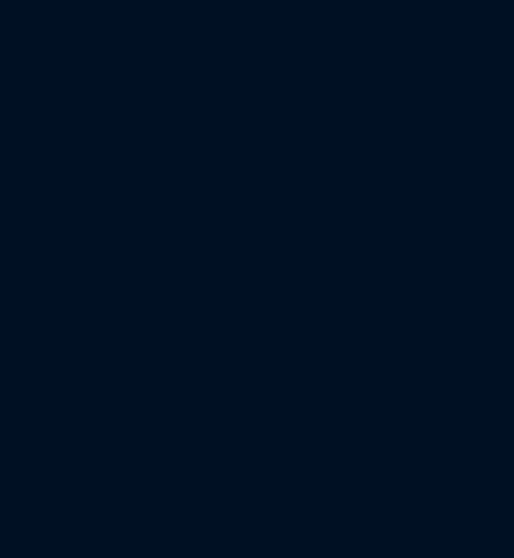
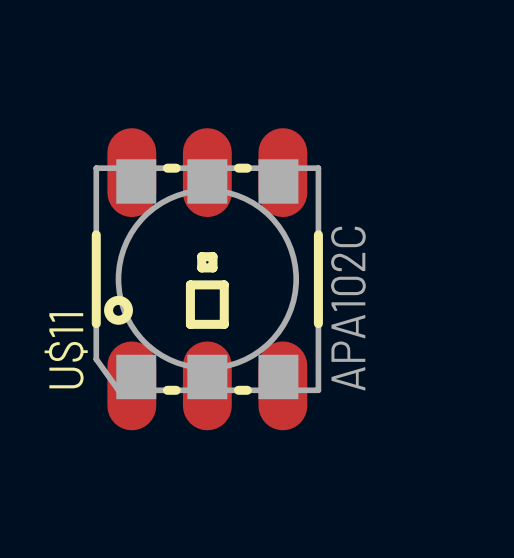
U$11: none -> APA102C (207, 279)

